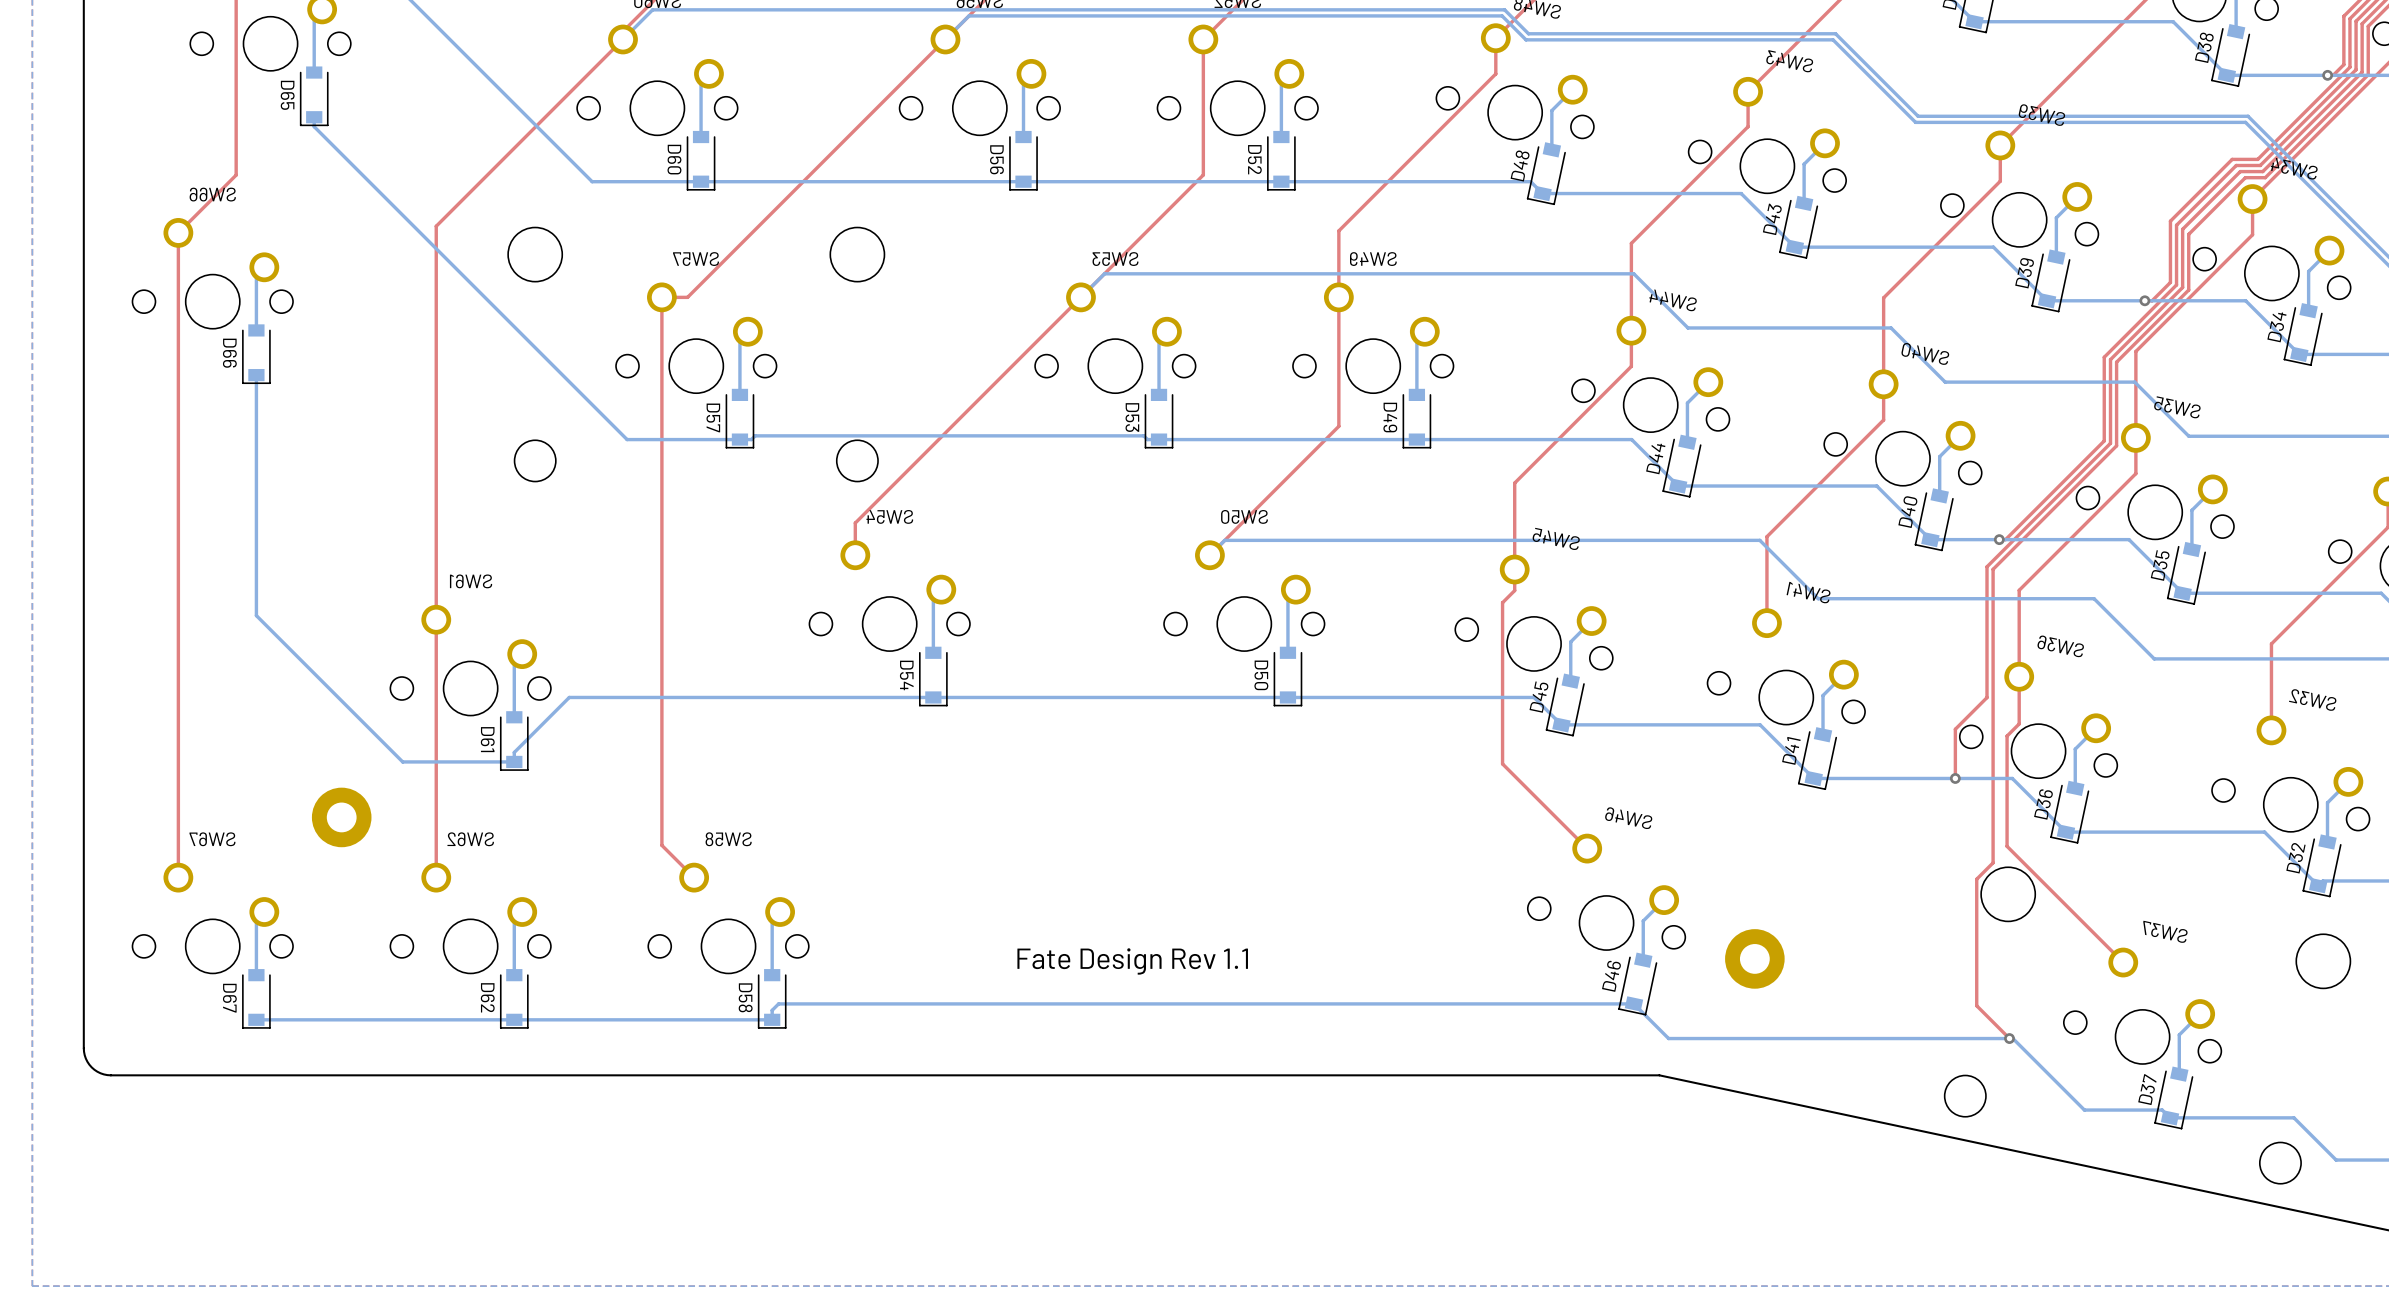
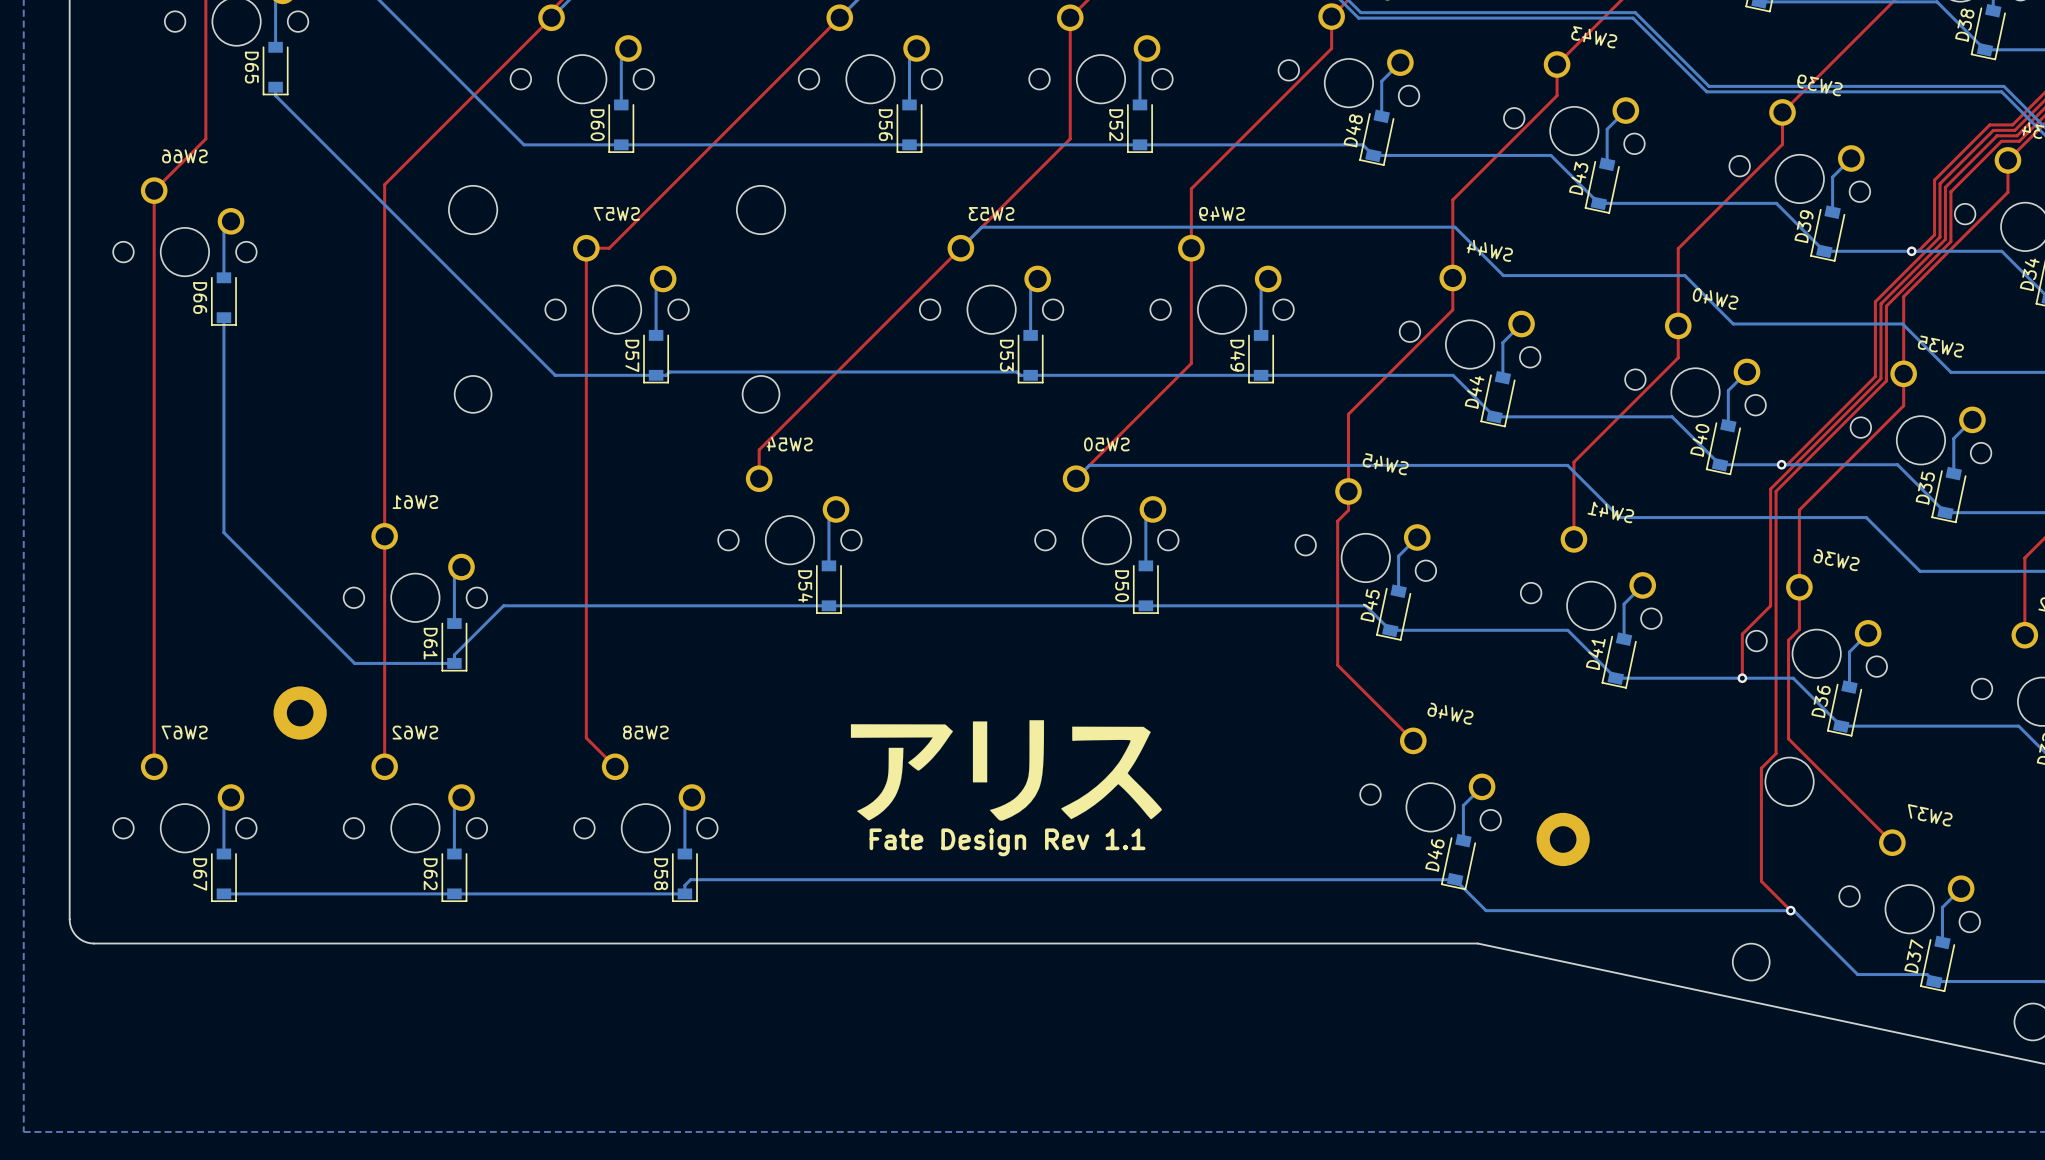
drawing: none -> [850, 720, 1162, 821]

